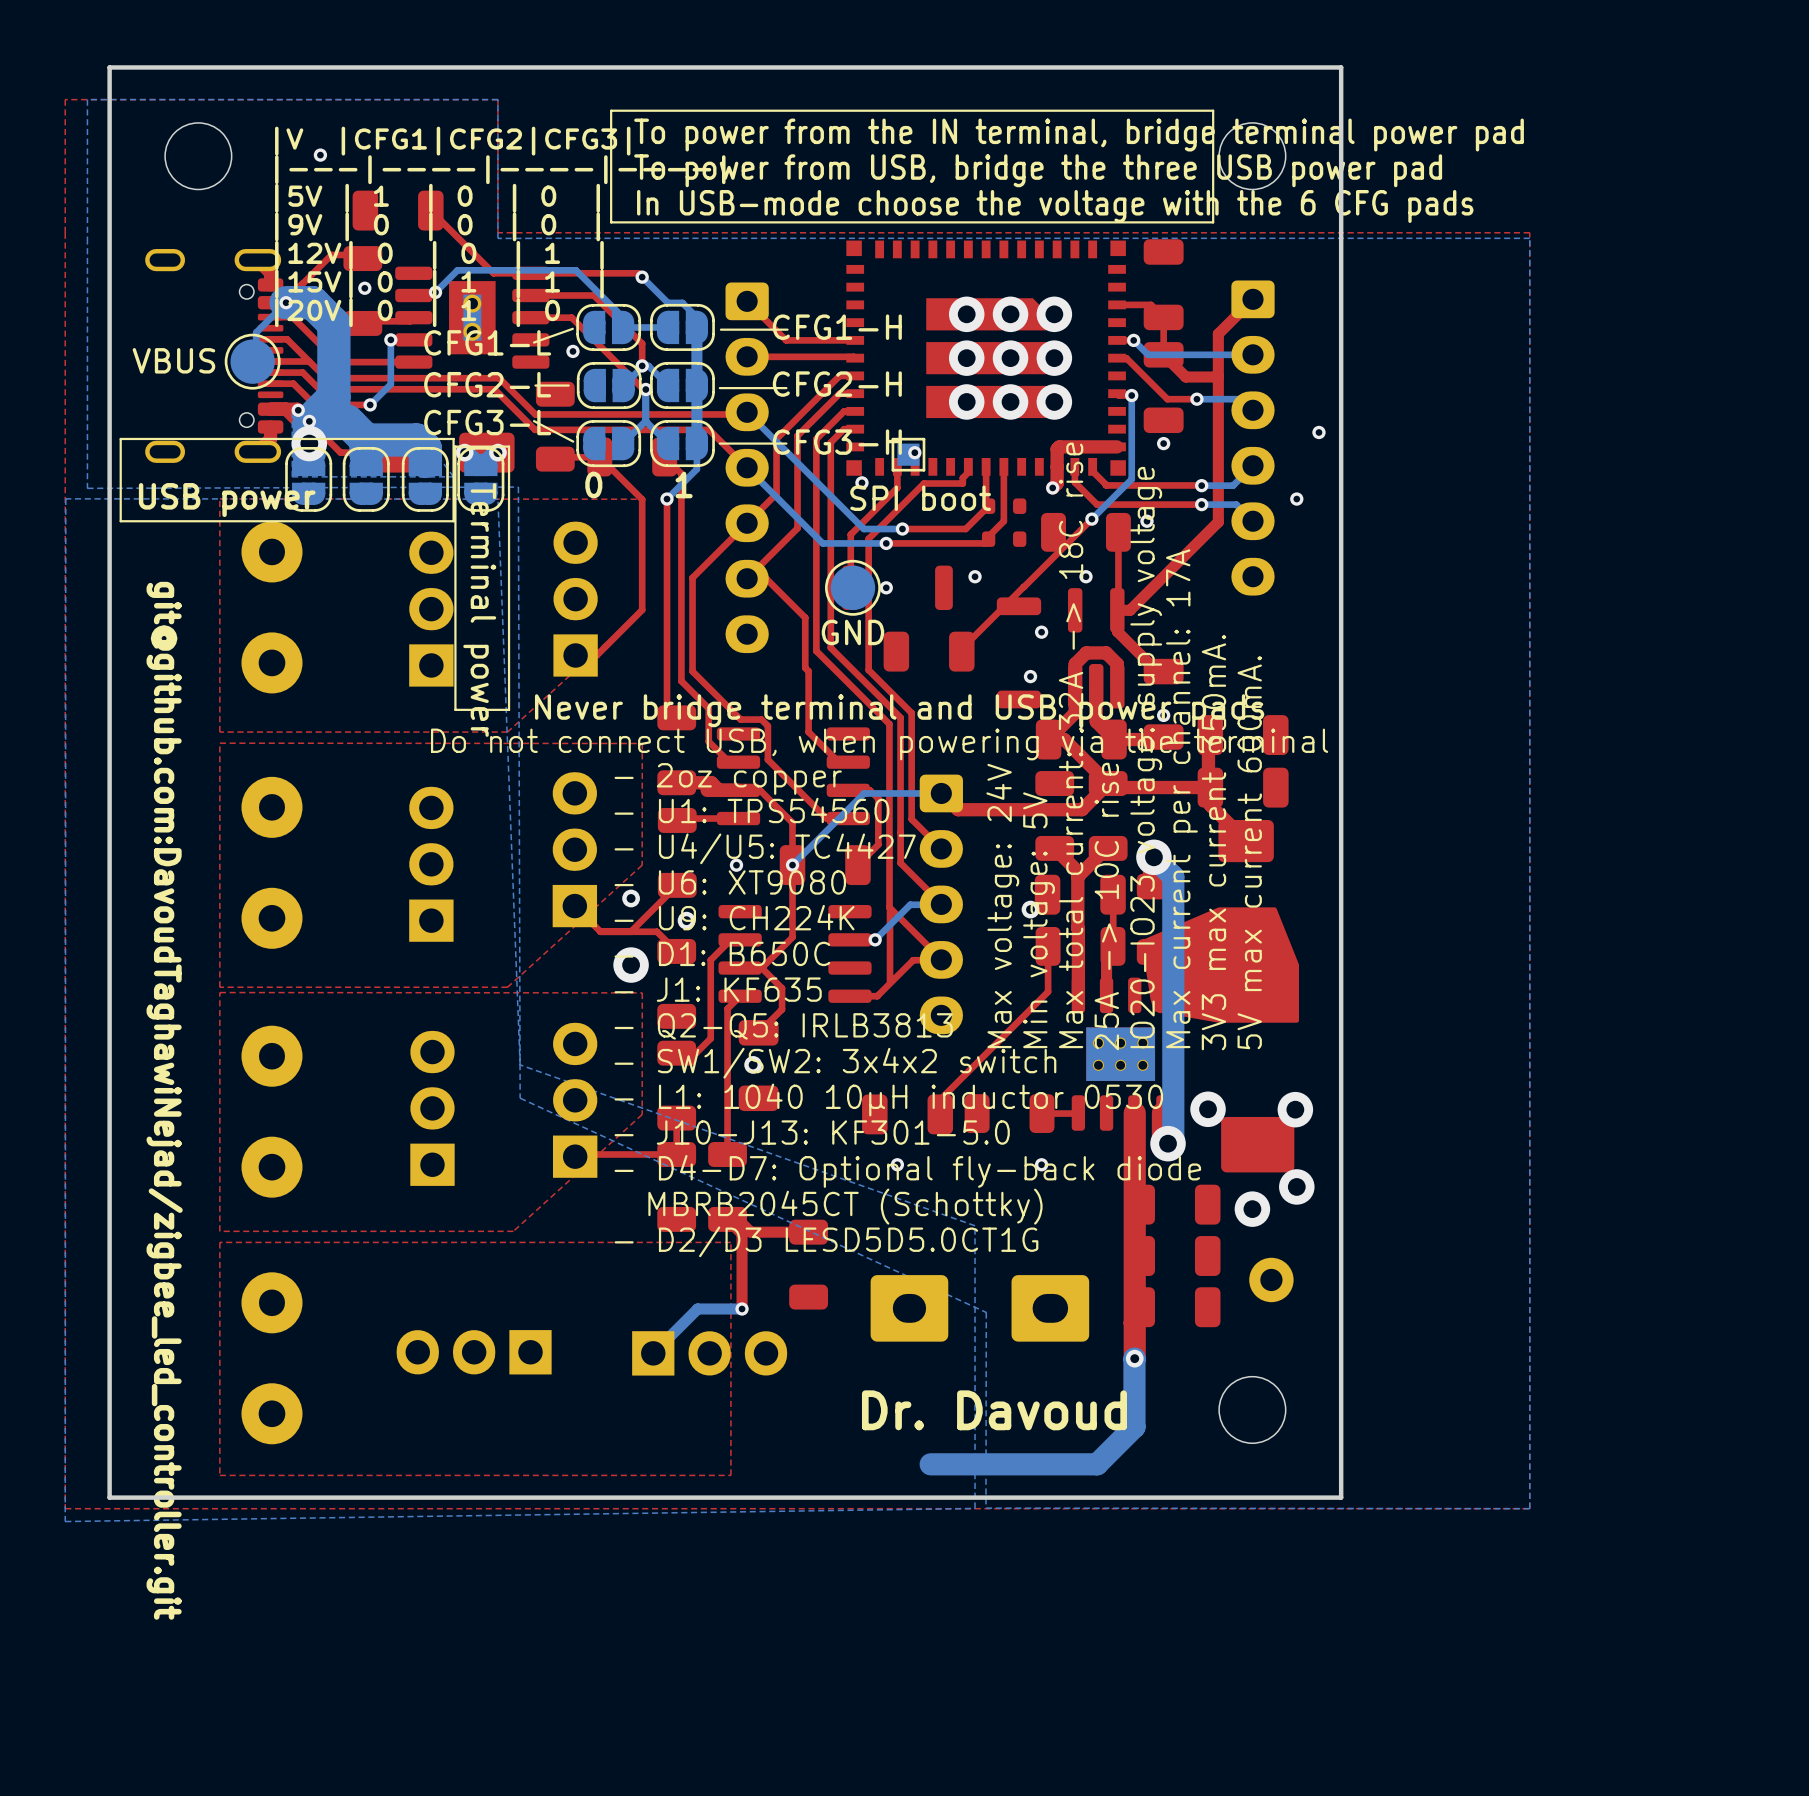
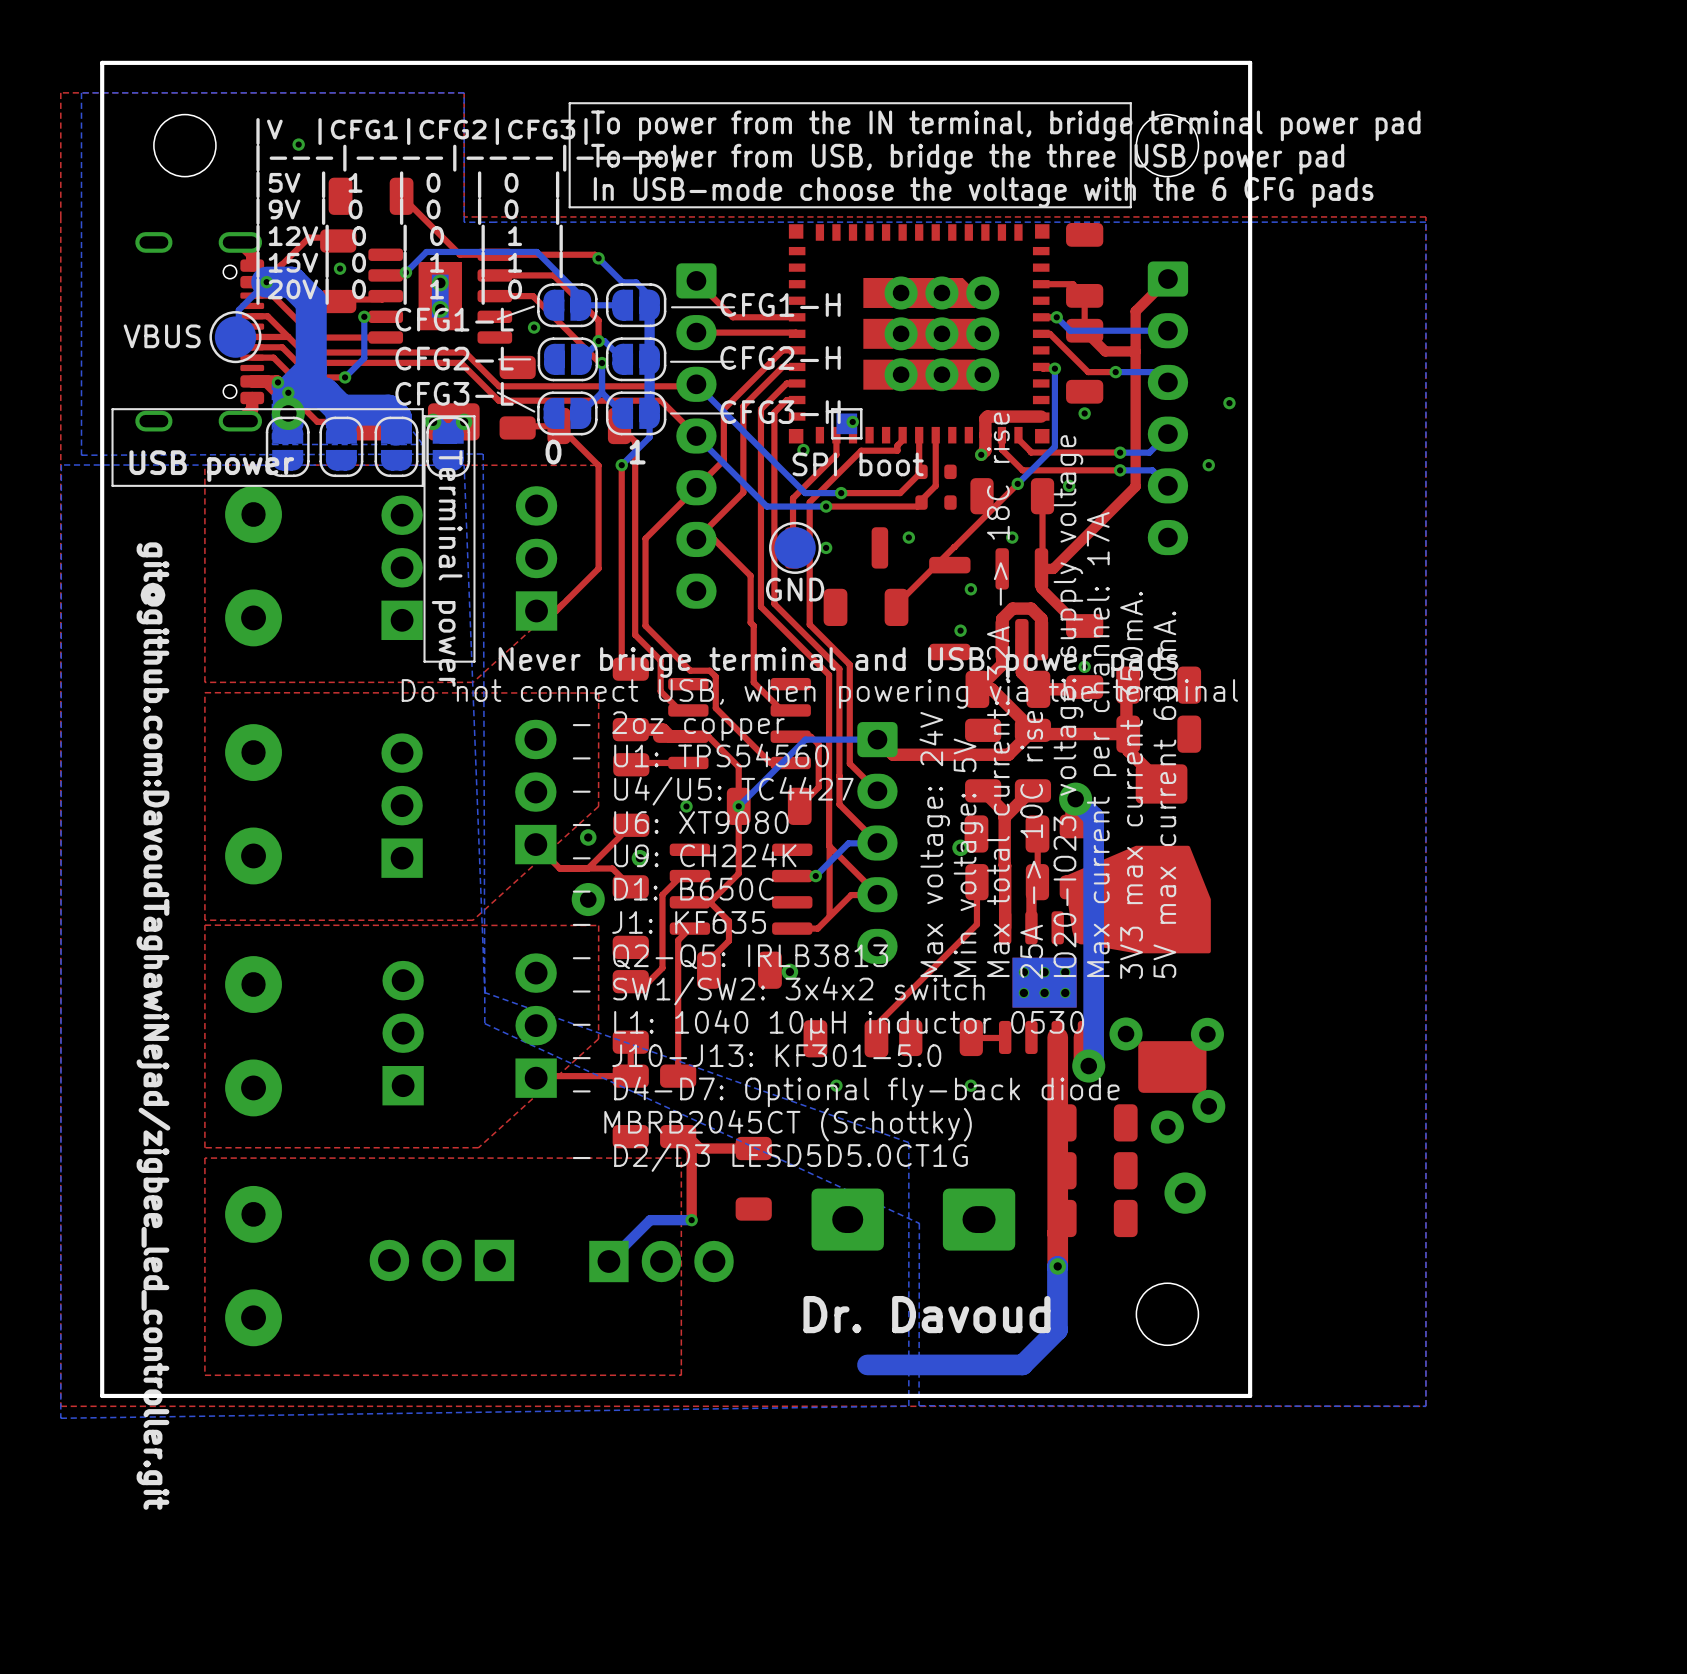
via position: (753, 1064) -> (789, 971)
part rotation: 0° (758, 1065) -> 90° clockwise (739, 970)

